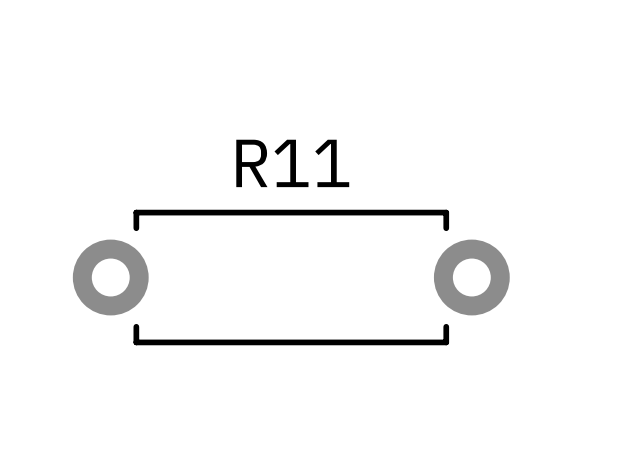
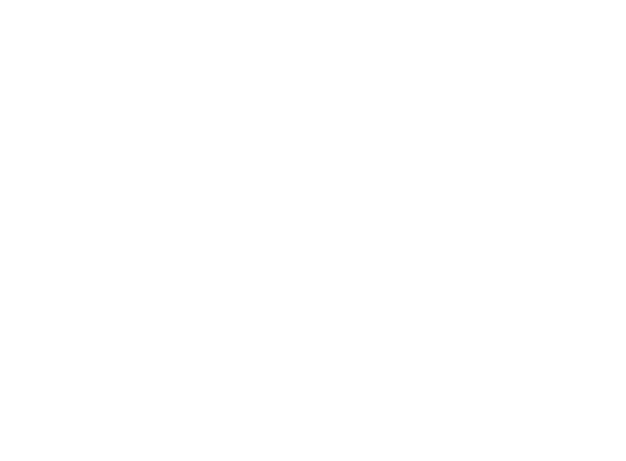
R11: (291, 277) -> none

